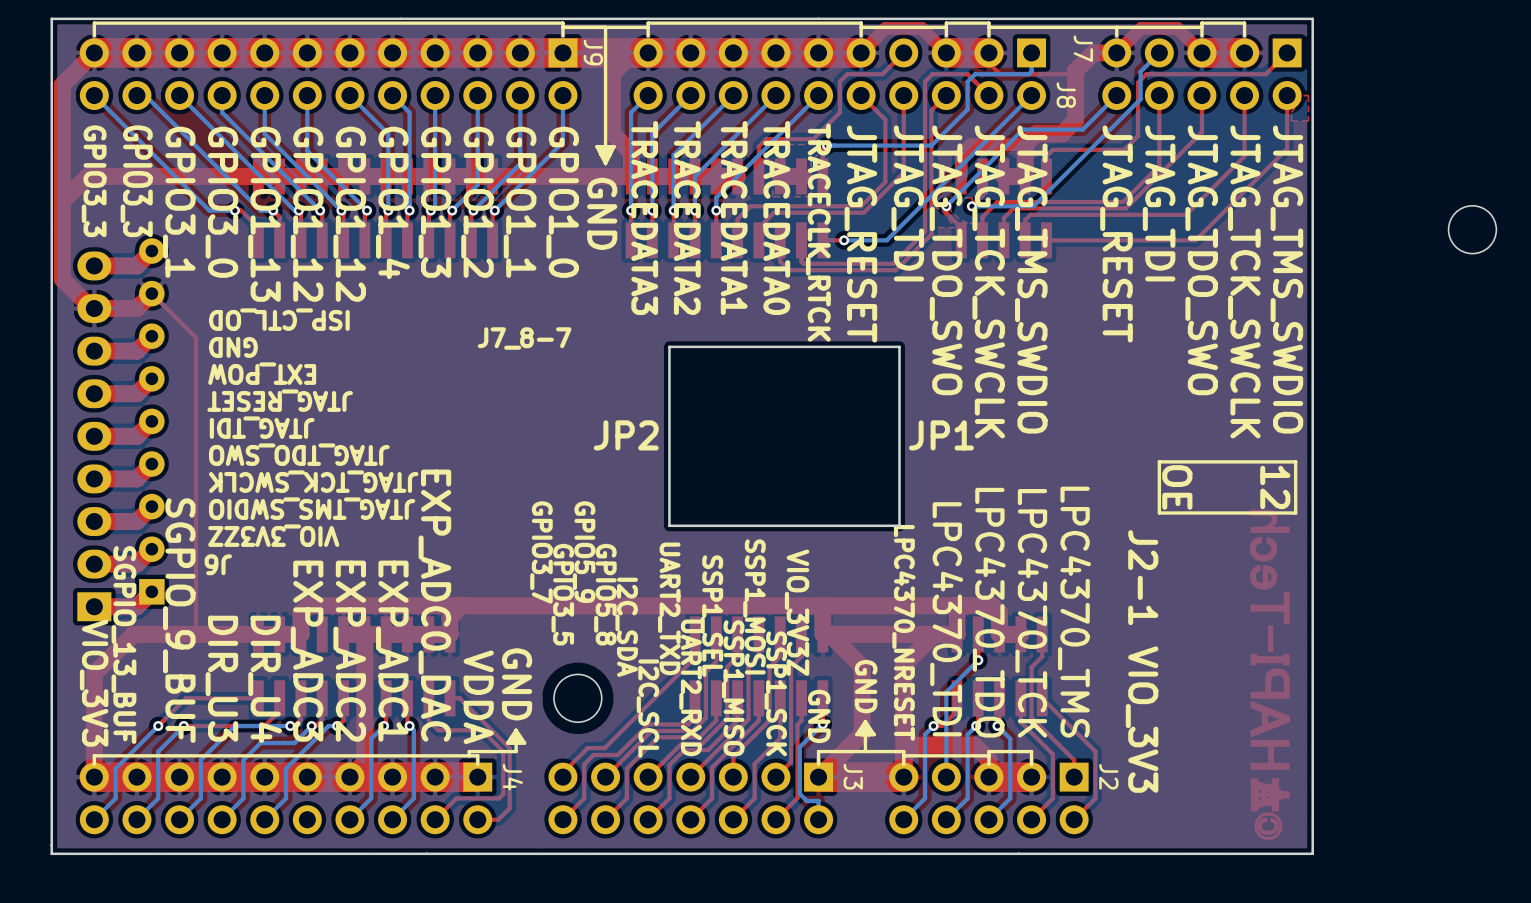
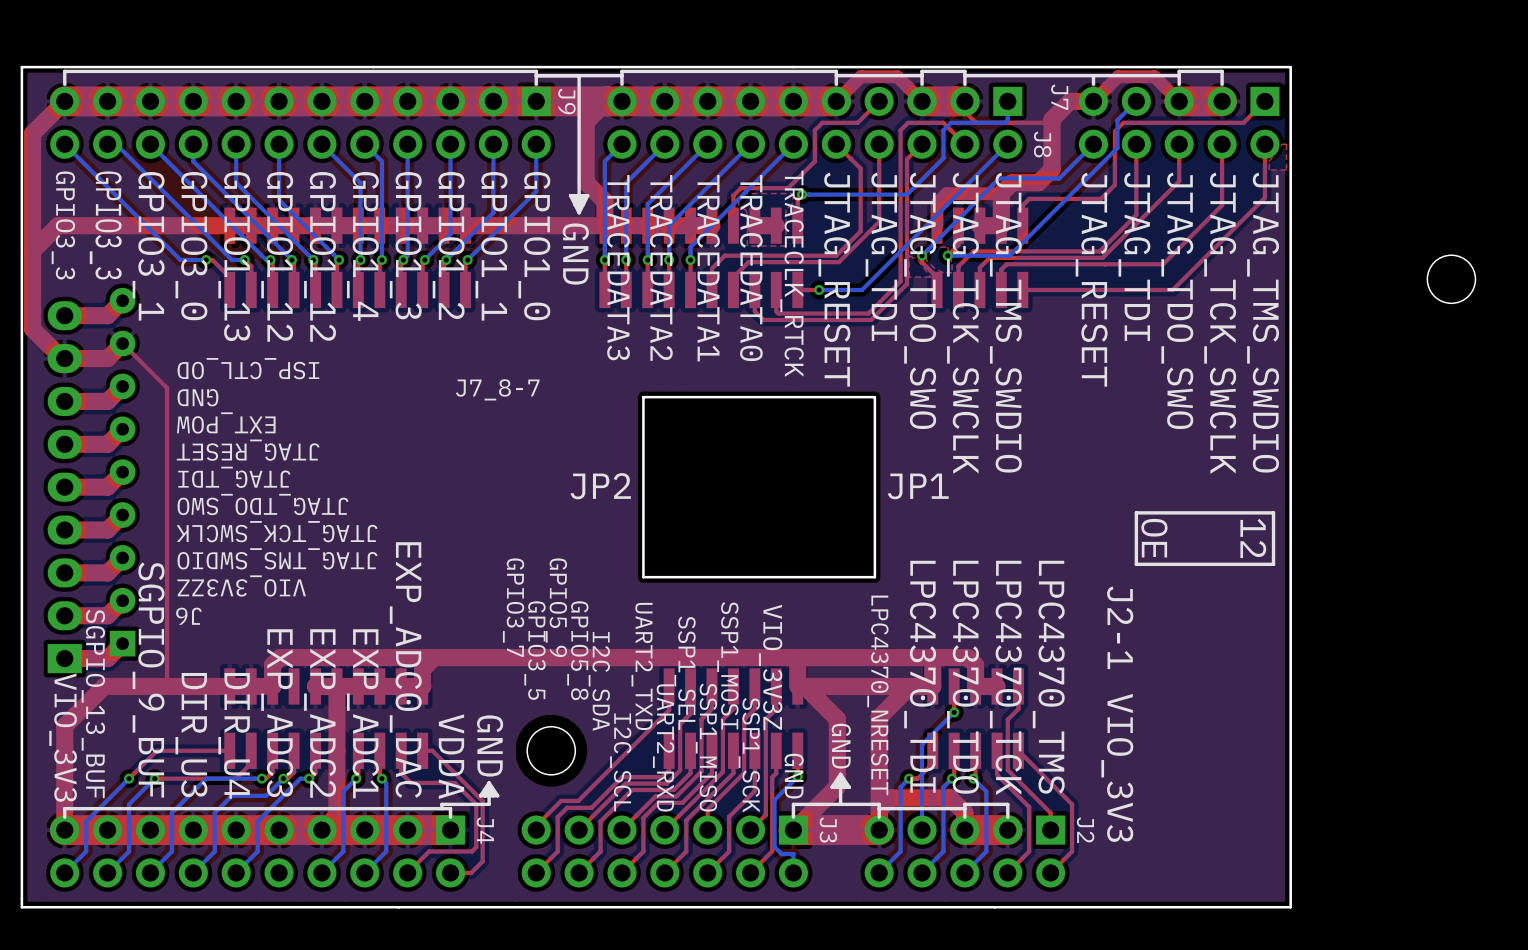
drawing: [1249, 509, 1291, 840] -> none

